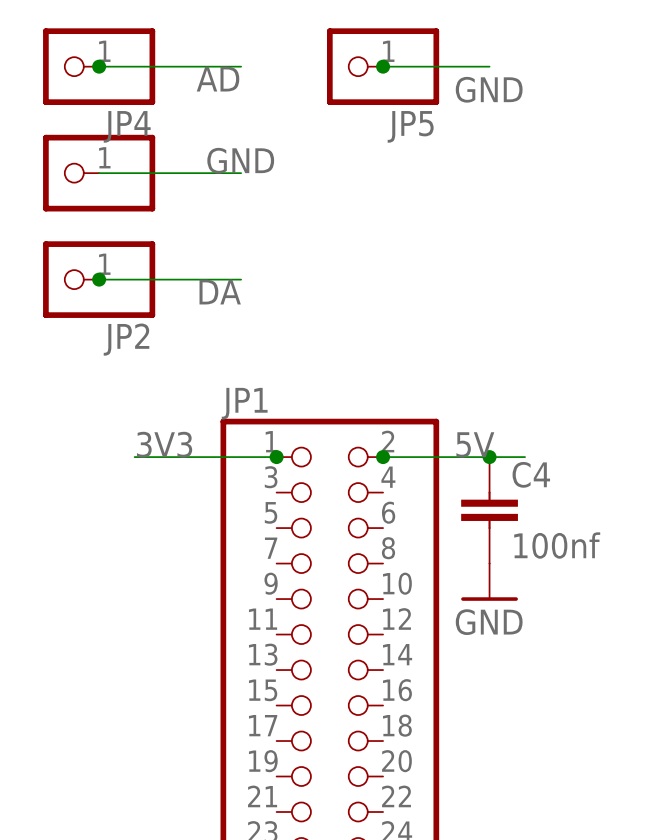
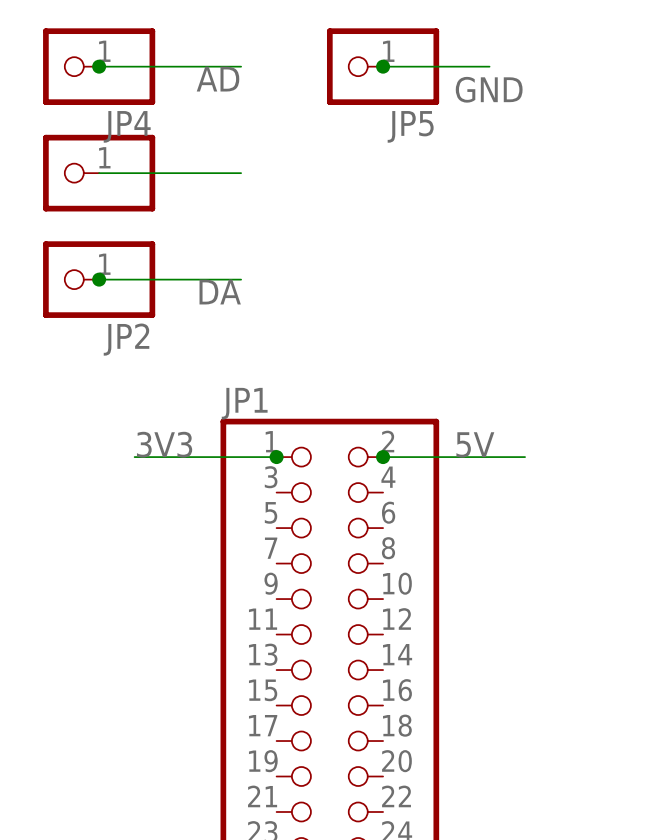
label: GND (240, 160) -> none
junction: (489, 457) -> none
C4: 100nf (489, 510) -> none
power symbol: GND (489, 582) -> none

